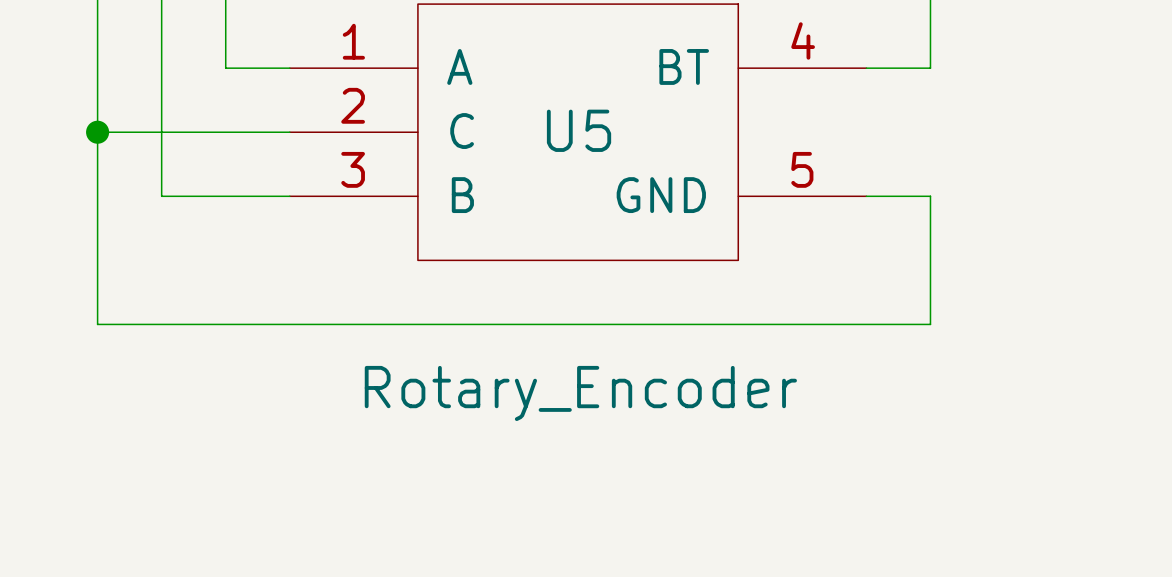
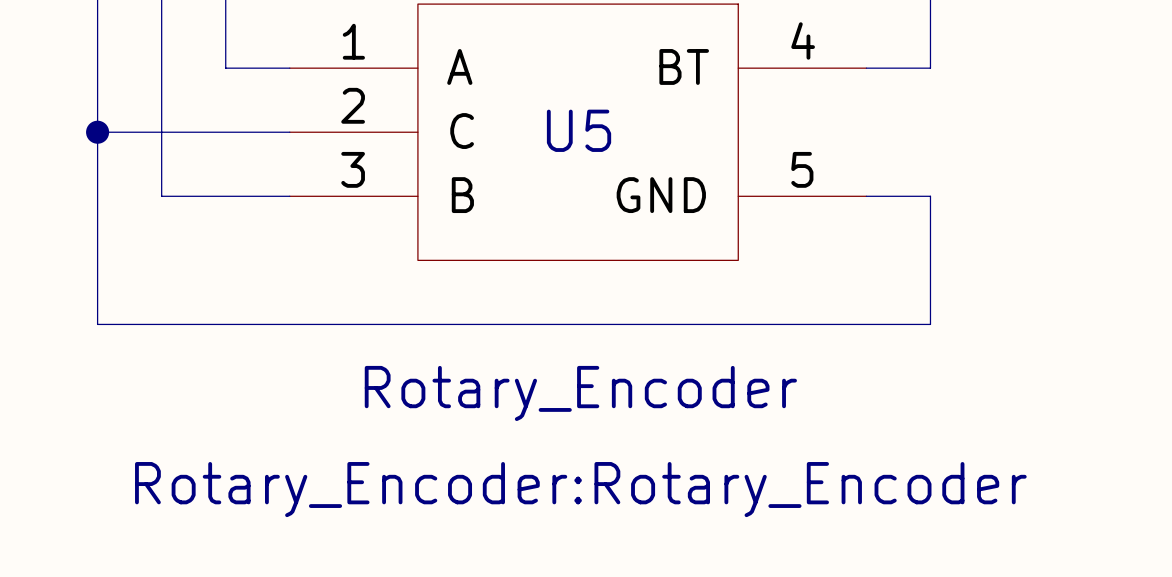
U5 text: none -> Rotary_Encoder:Rotary_Encoder (580, 489)

